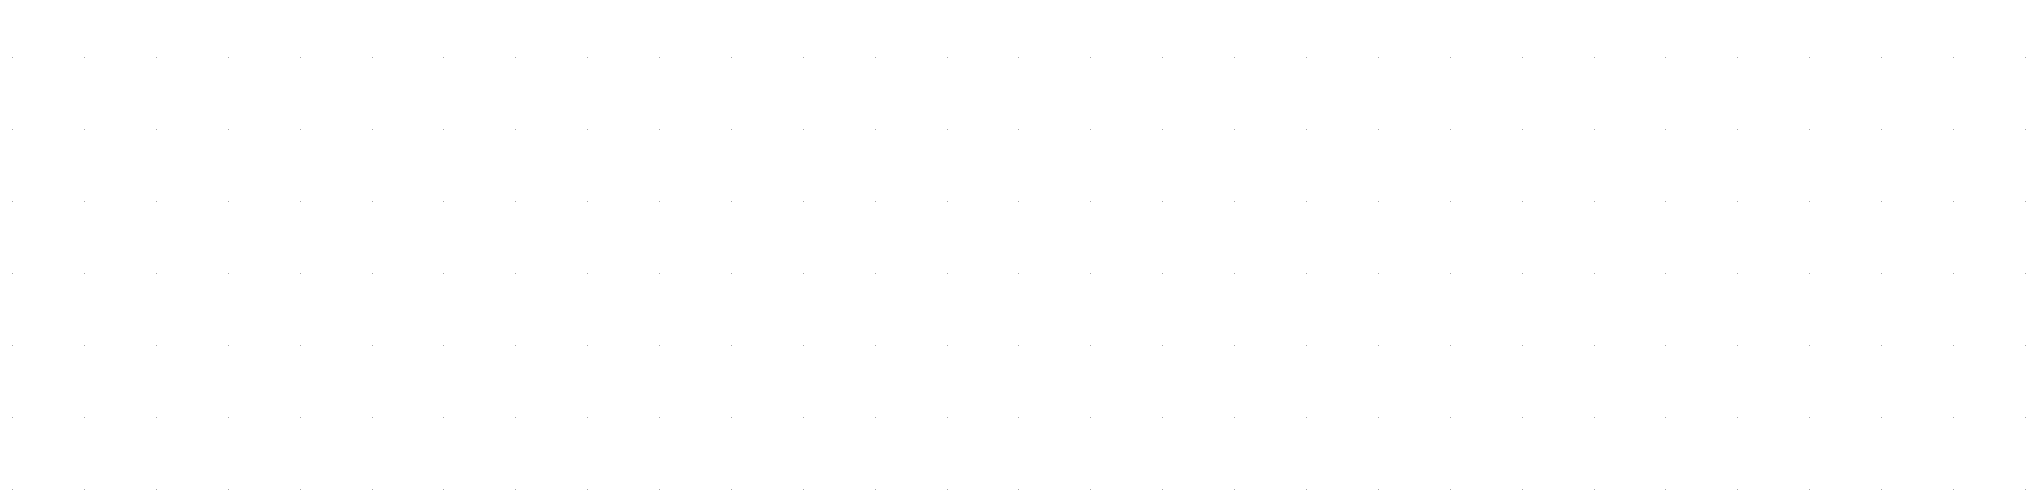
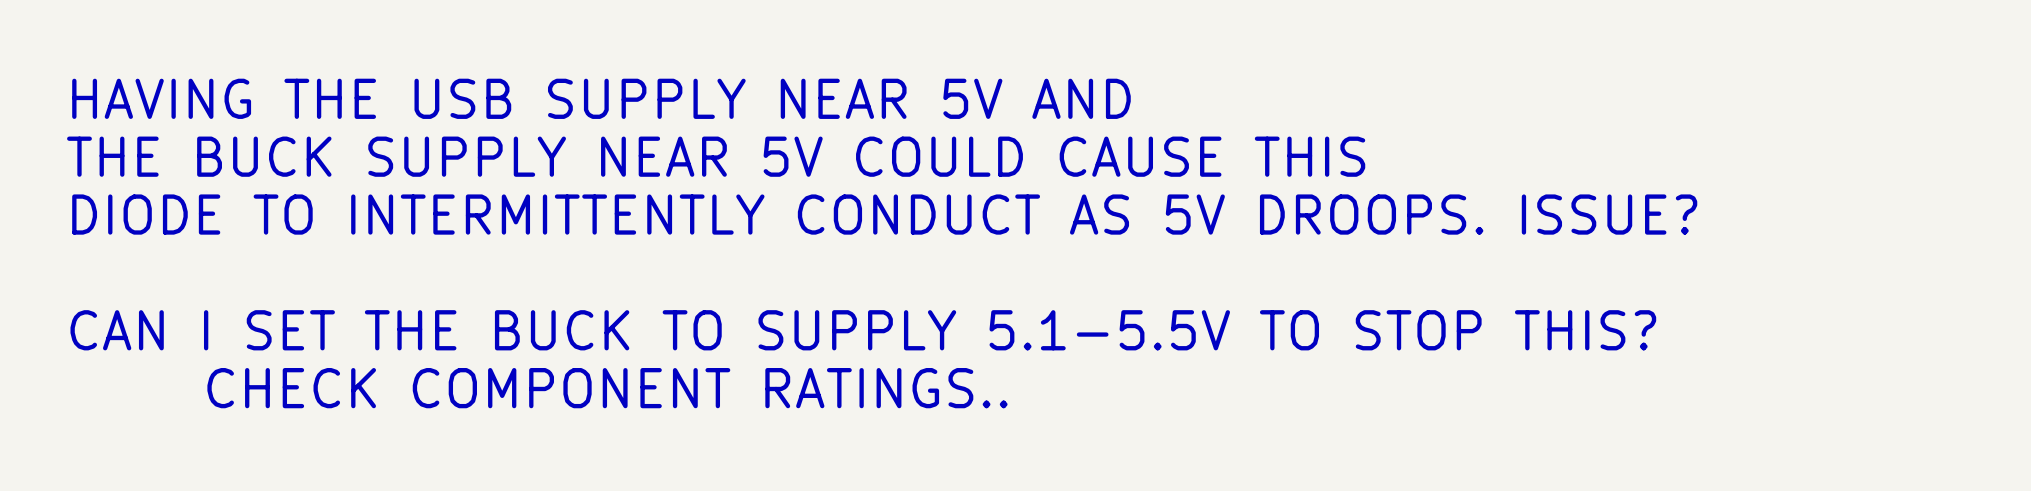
text: none -> HAVING THE USB SUPPLY NEAR 5V AND (601, 98)
text: none -> THE BUCK SUPPLY NEAR 5V COULD CAUSE THIS (716, 156)
text: none -> DIODE TO INTERMITTENTLY CONDUCT AS 5V DROOPS. ISSUE? (884, 214)
text: none -> CAN I SET THE BUCK TO SUPPLY 5.1-5.5V TO STOP THIS? (863, 330)
text: none -> CHECK COMPONENT RATINGS.. (607, 388)

